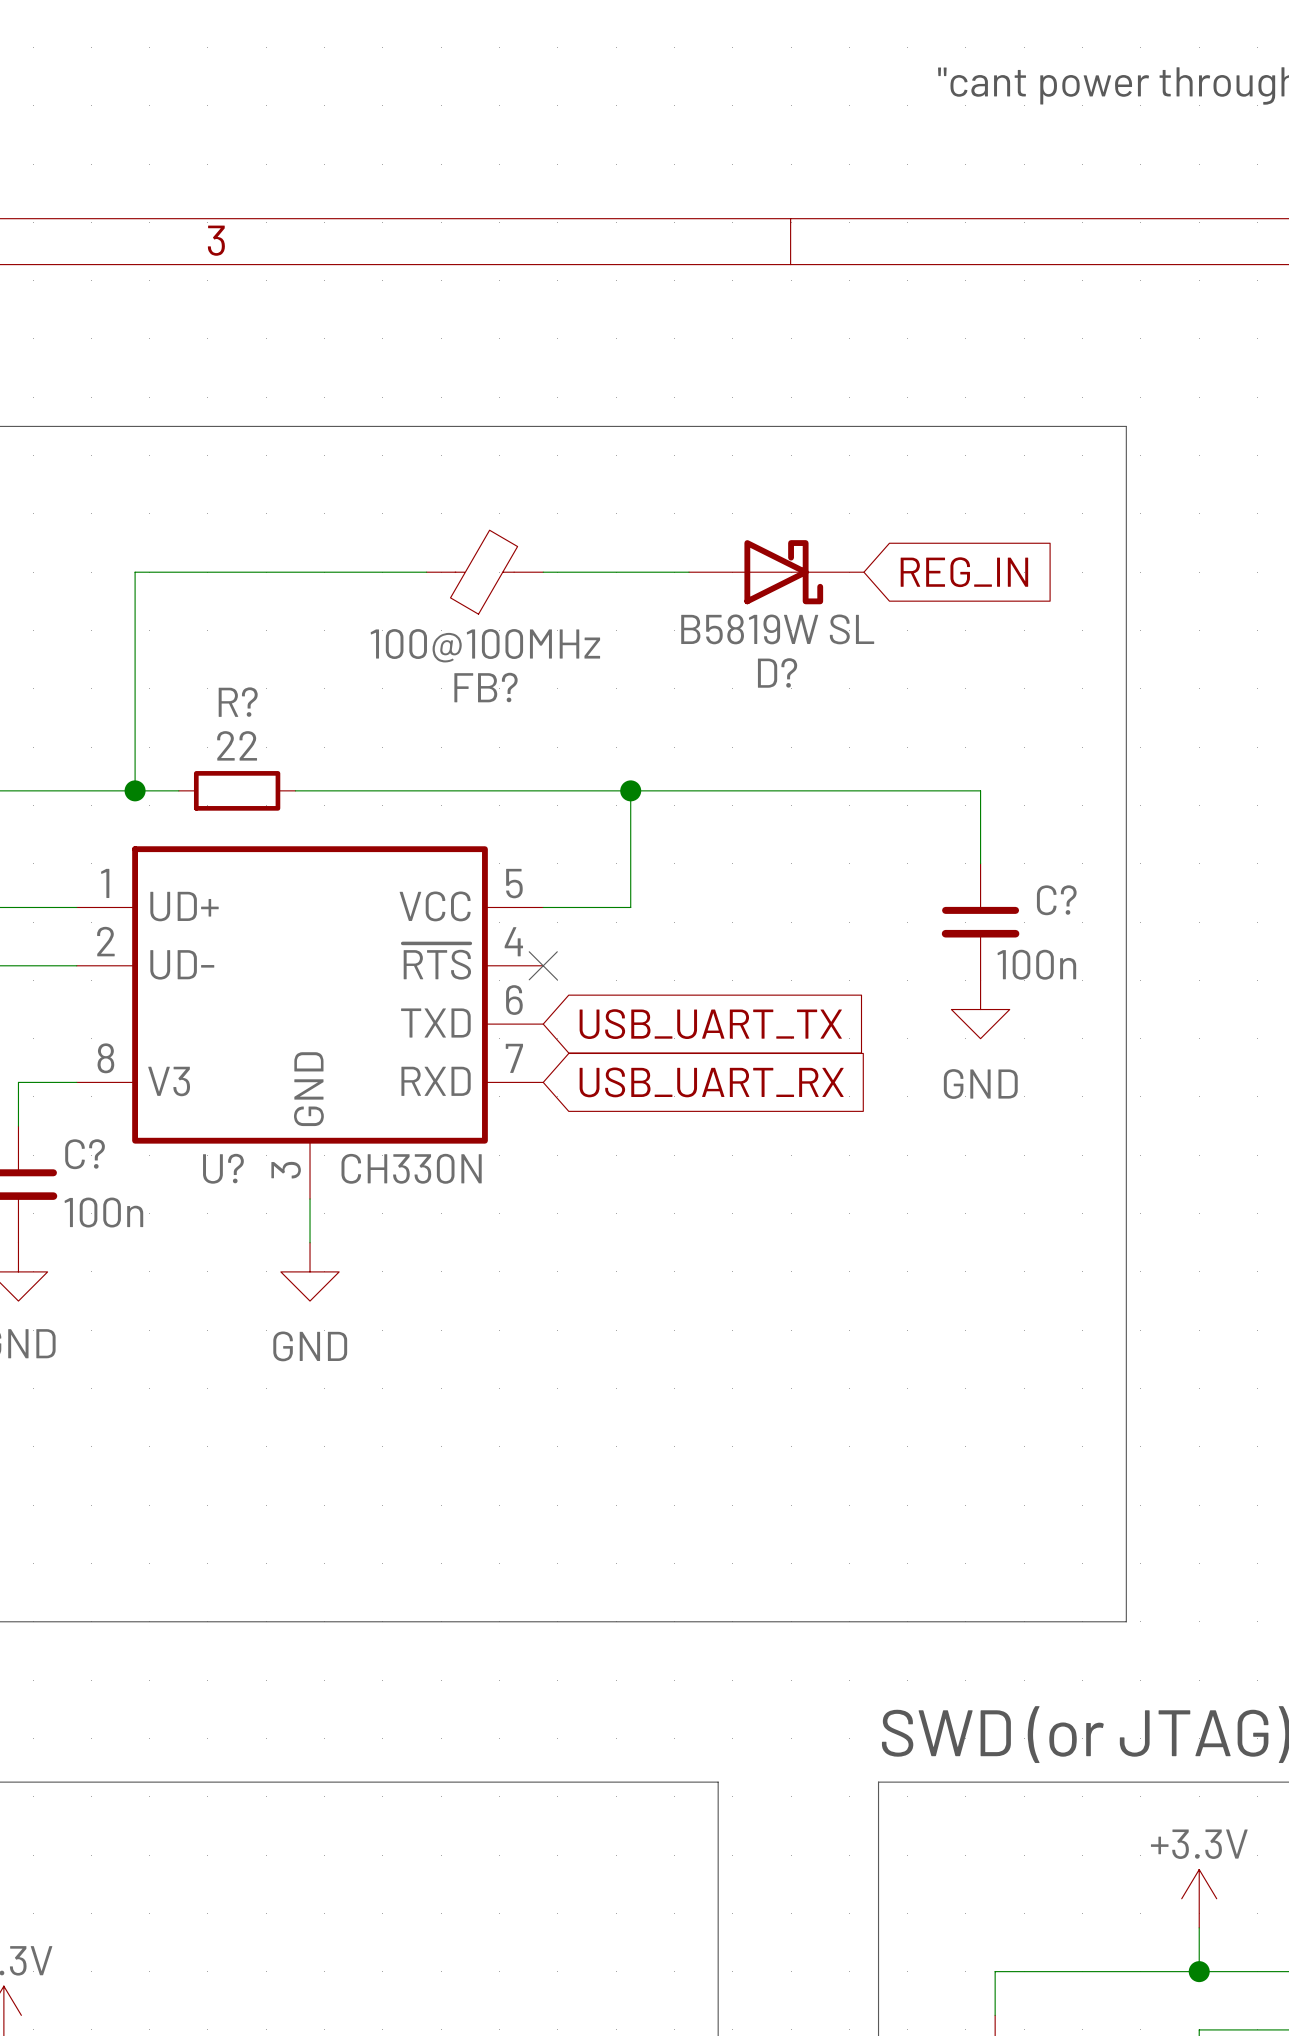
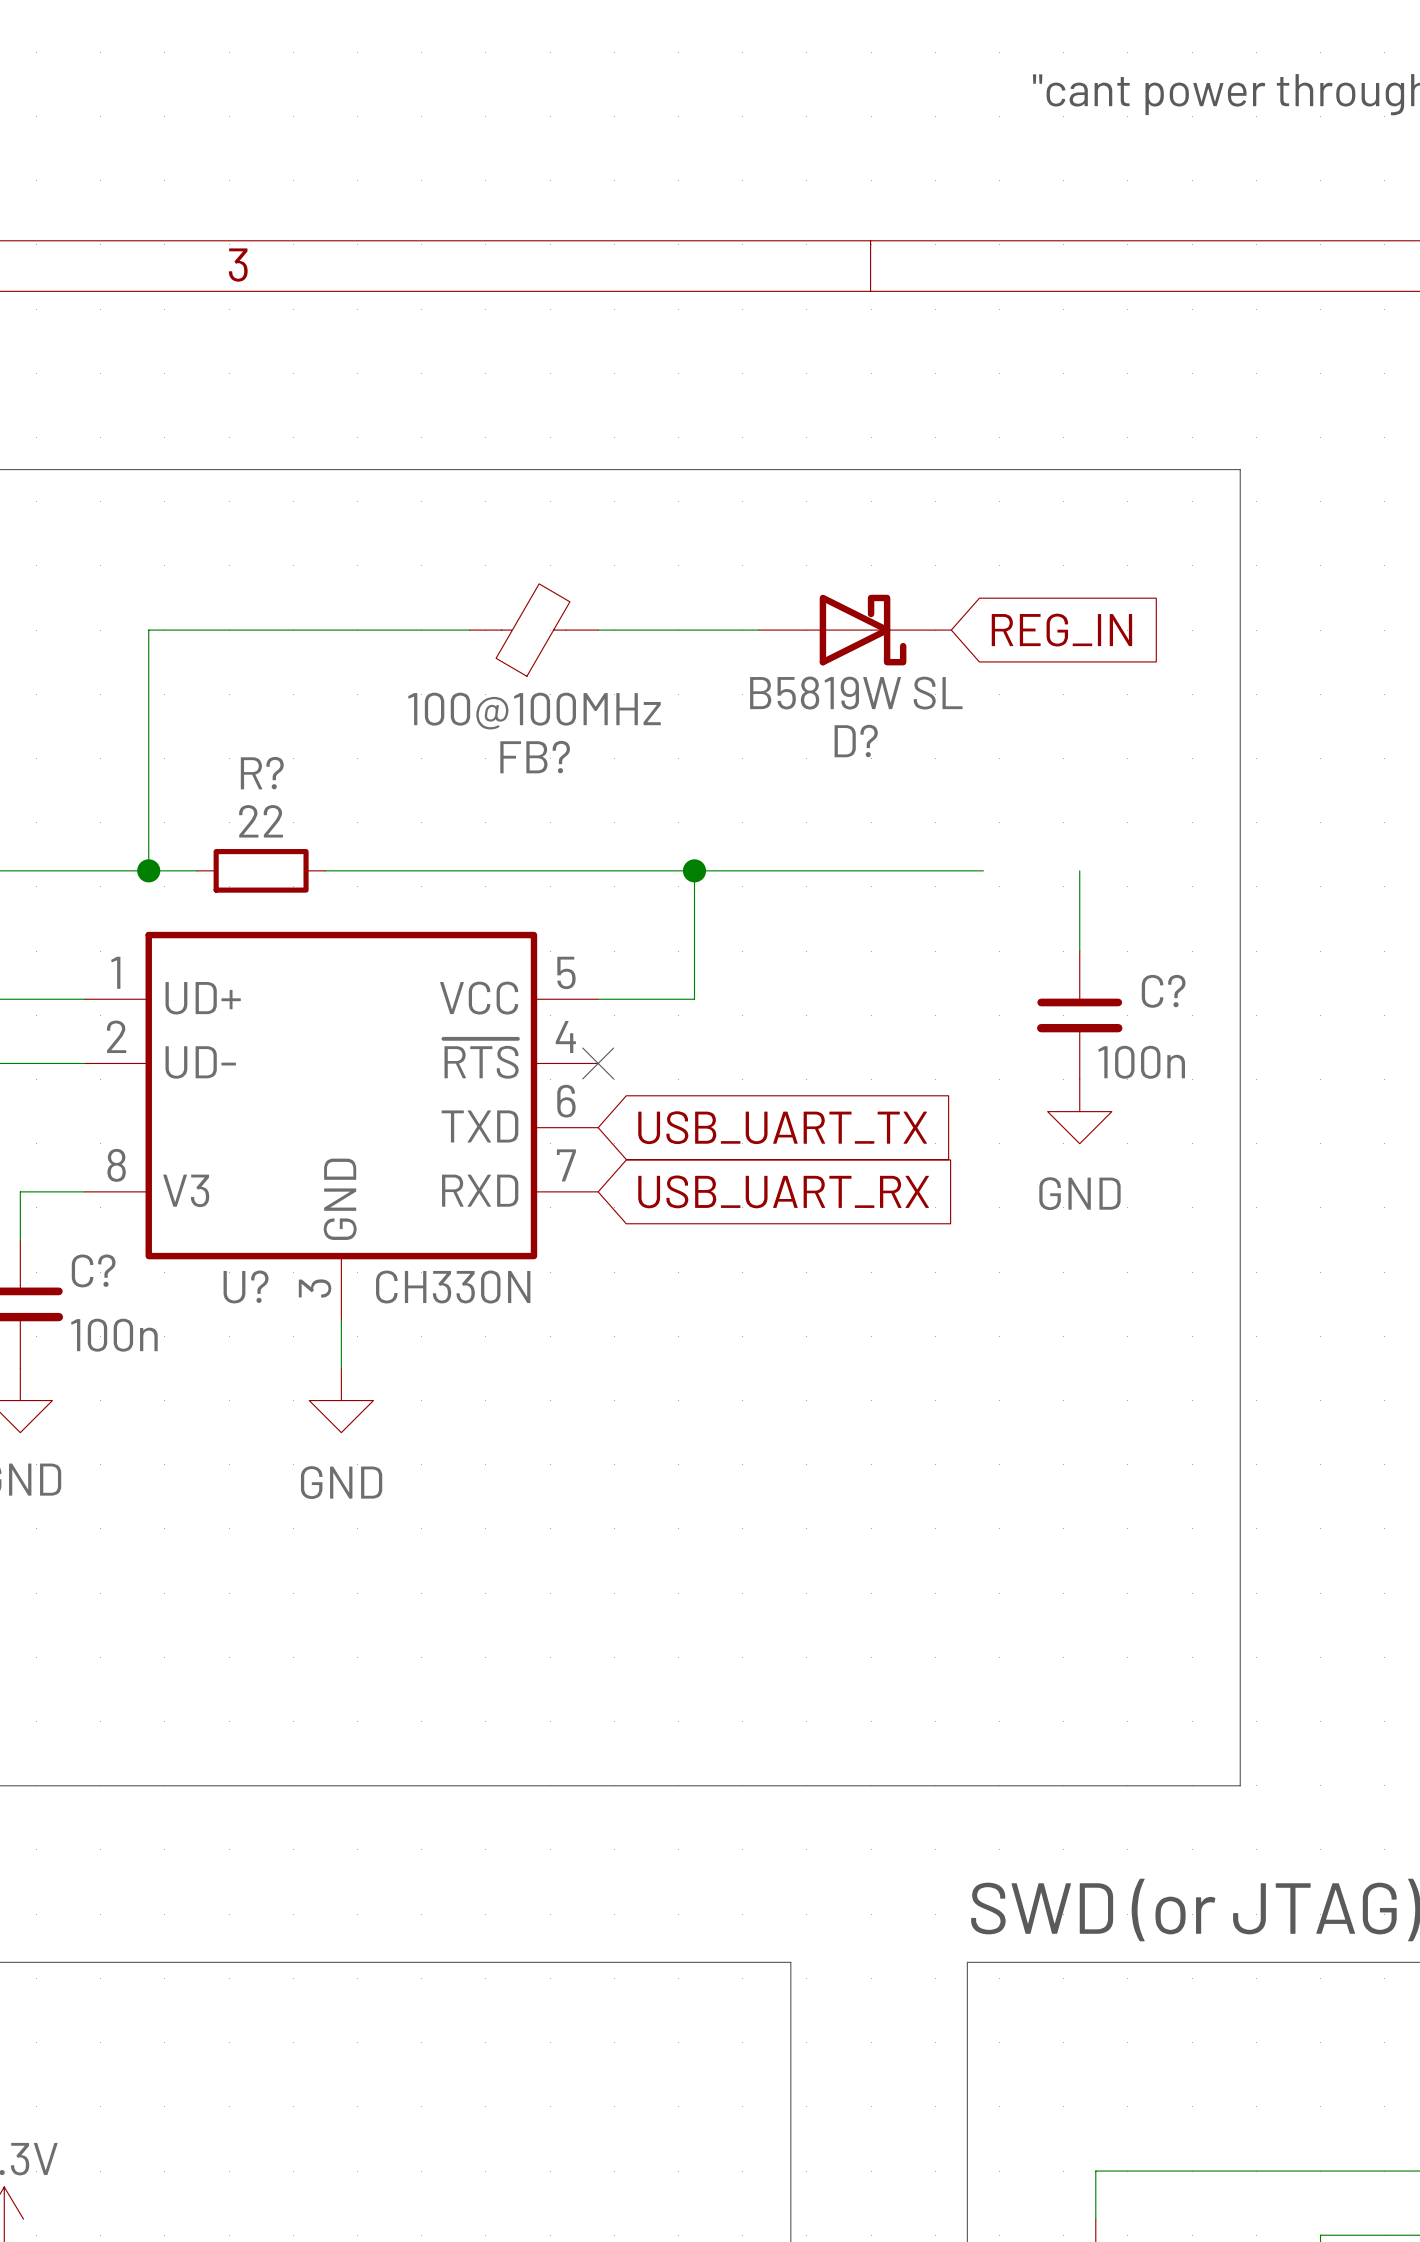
wire: (893, 790) (980, 790) -> none
power symbol: +3.3V (1199, 1898) -> none
wire: (1199, 1927) (1199, 1971) -> none
junction: (1199, 1971) -> none

